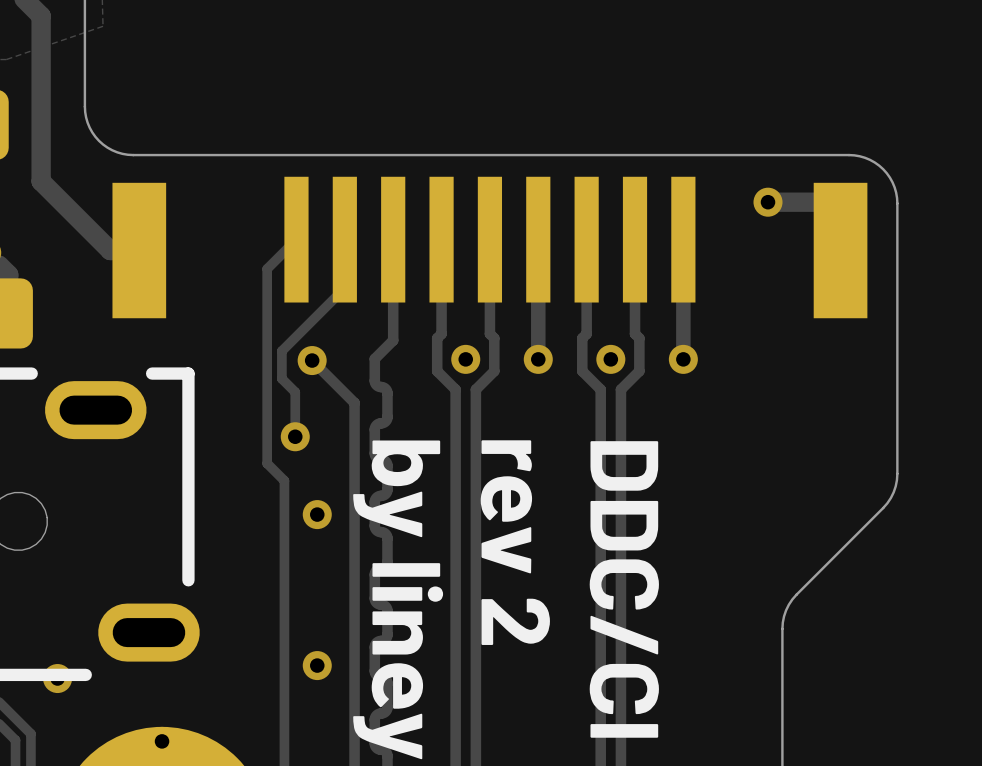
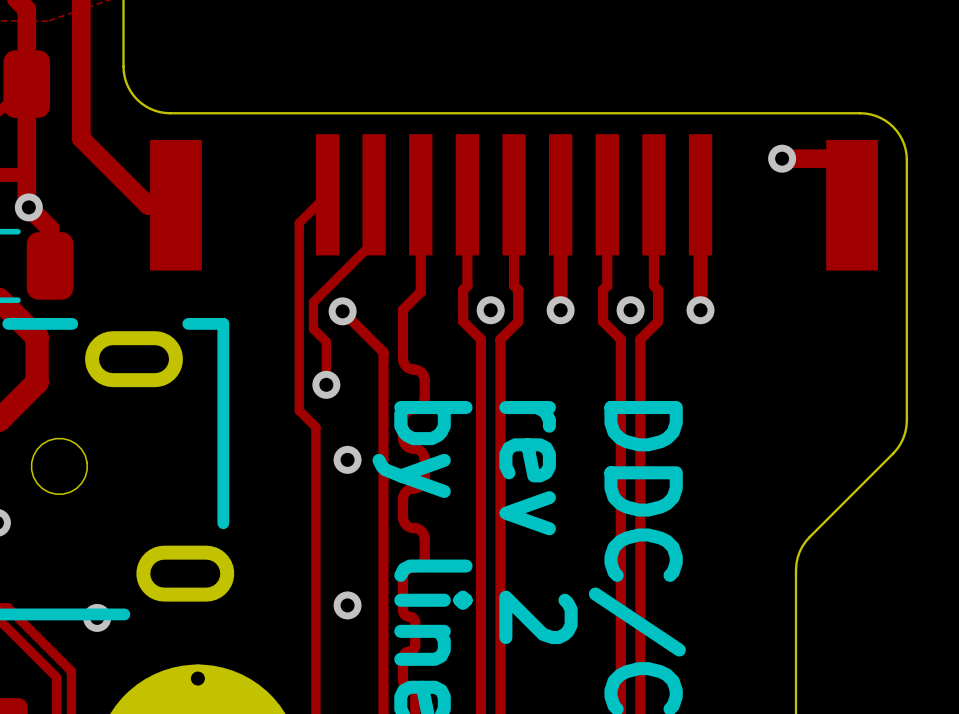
track: (374, 380) (377, 385) (385, 388) (387, 393) (387, 419) (384, 422) (377, 424) (374, 429) (375, 455) (377, 458) (385, 460) (387, 465) (387, 491) (384, 494) (377, 497) (374, 502) (375, 527) (387, 537) (387, 562) (385, 567) (377, 569) (375, 572) (374, 598) (377, 603) (384, 605) (387, 608) (387, 634) (385, 639) (376, 642) (374, 647) -> (403, 330) (404, 363) (409, 368) (420, 371) (424, 380) (423, 403) (418, 408) (407, 411) (403, 420) (404, 443) (409, 447) (420, 451) (424, 458) (424, 481) (419, 486) (409, 489) (404, 493) (403, 517) (407, 525) (418, 529) (423, 534) (424, 558) (420, 565) (405, 571) (403, 587)

